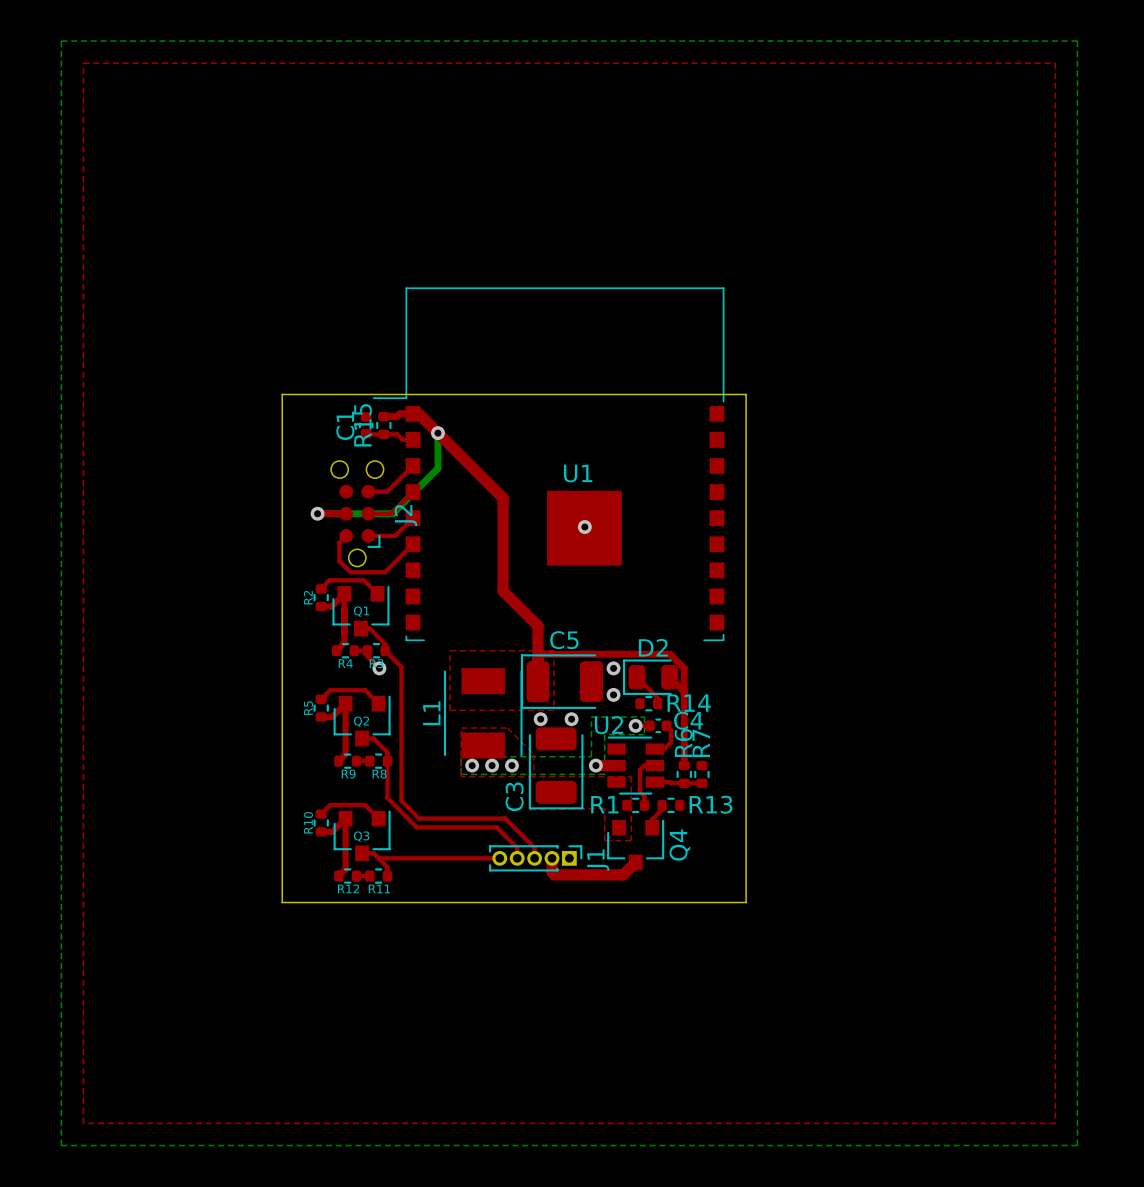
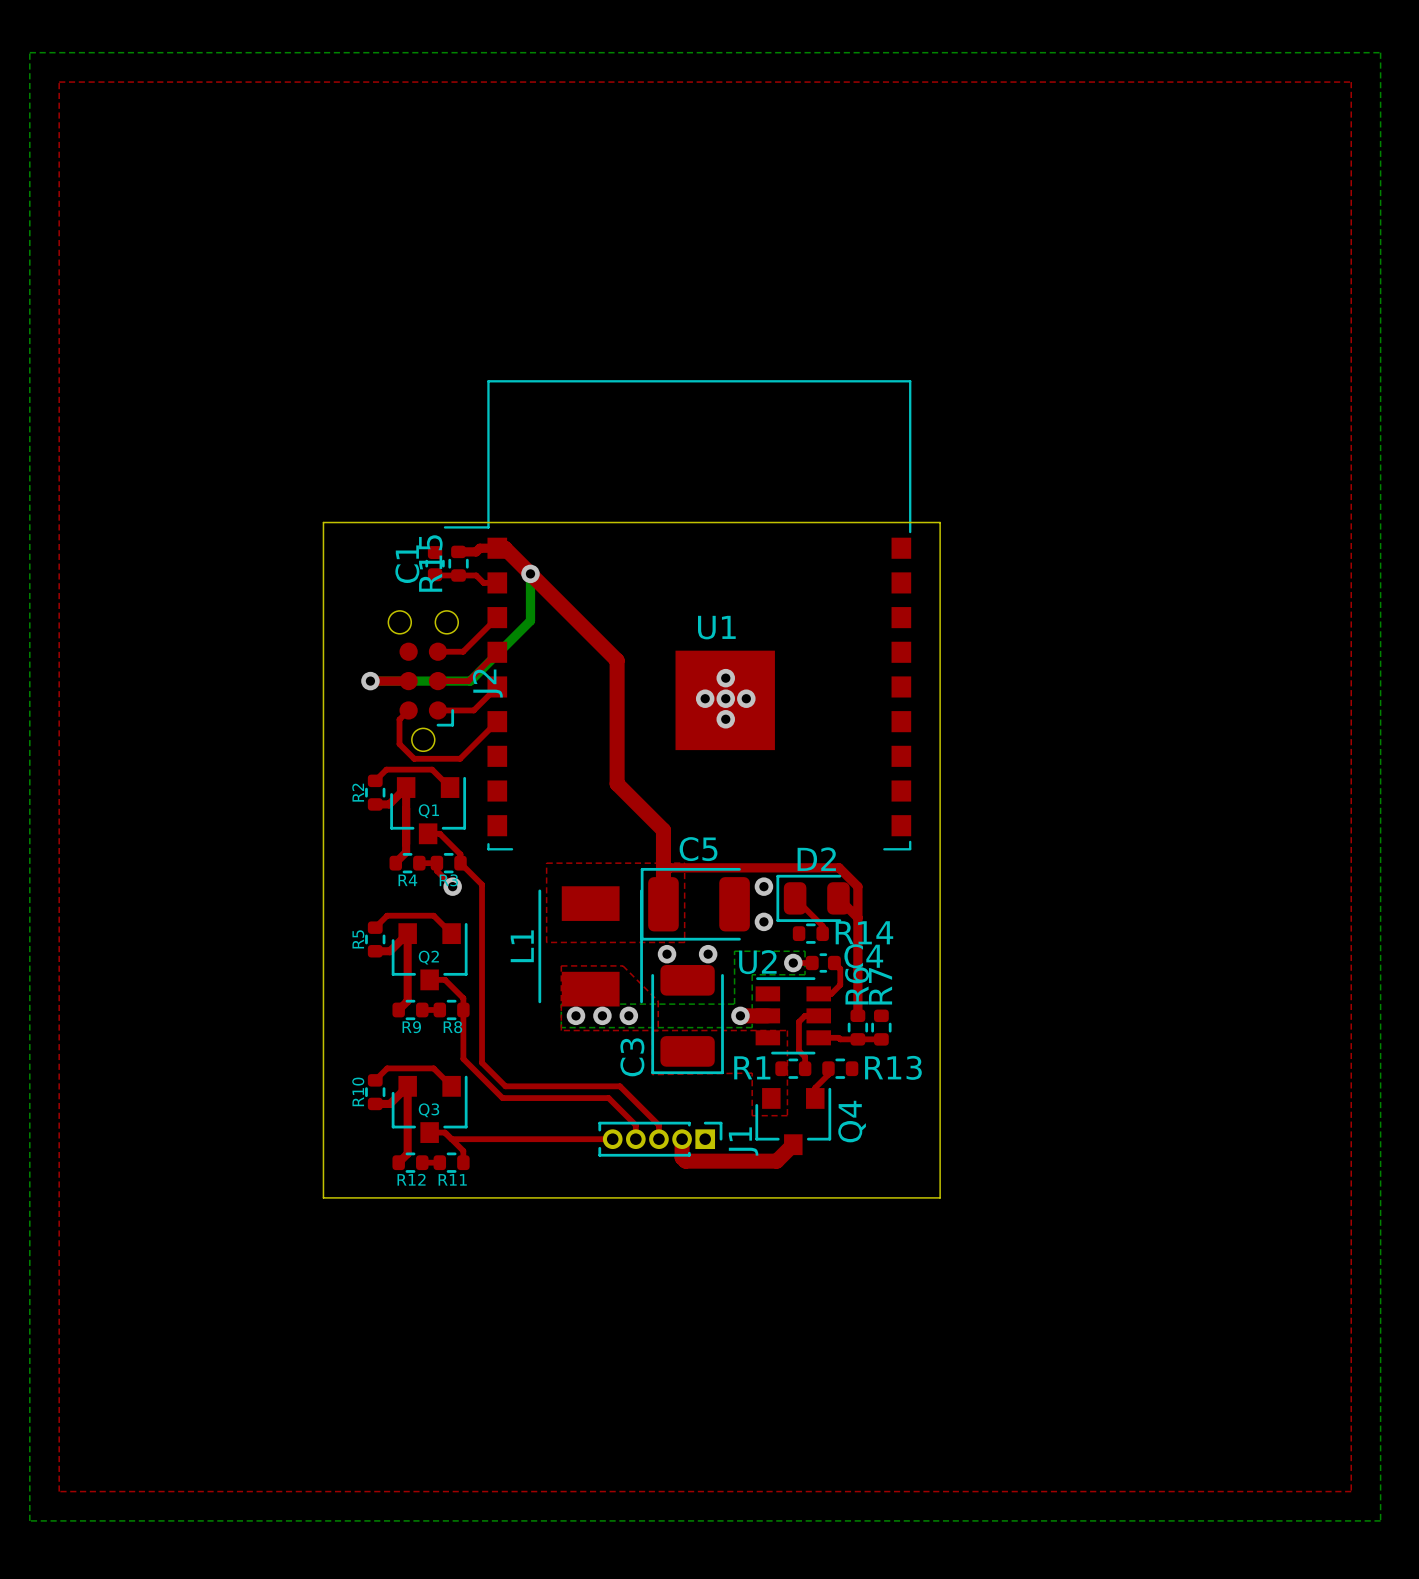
via: none -> (725, 678)
via: none -> (705, 698)
via: none -> (746, 698)
via: none -> (725, 719)

